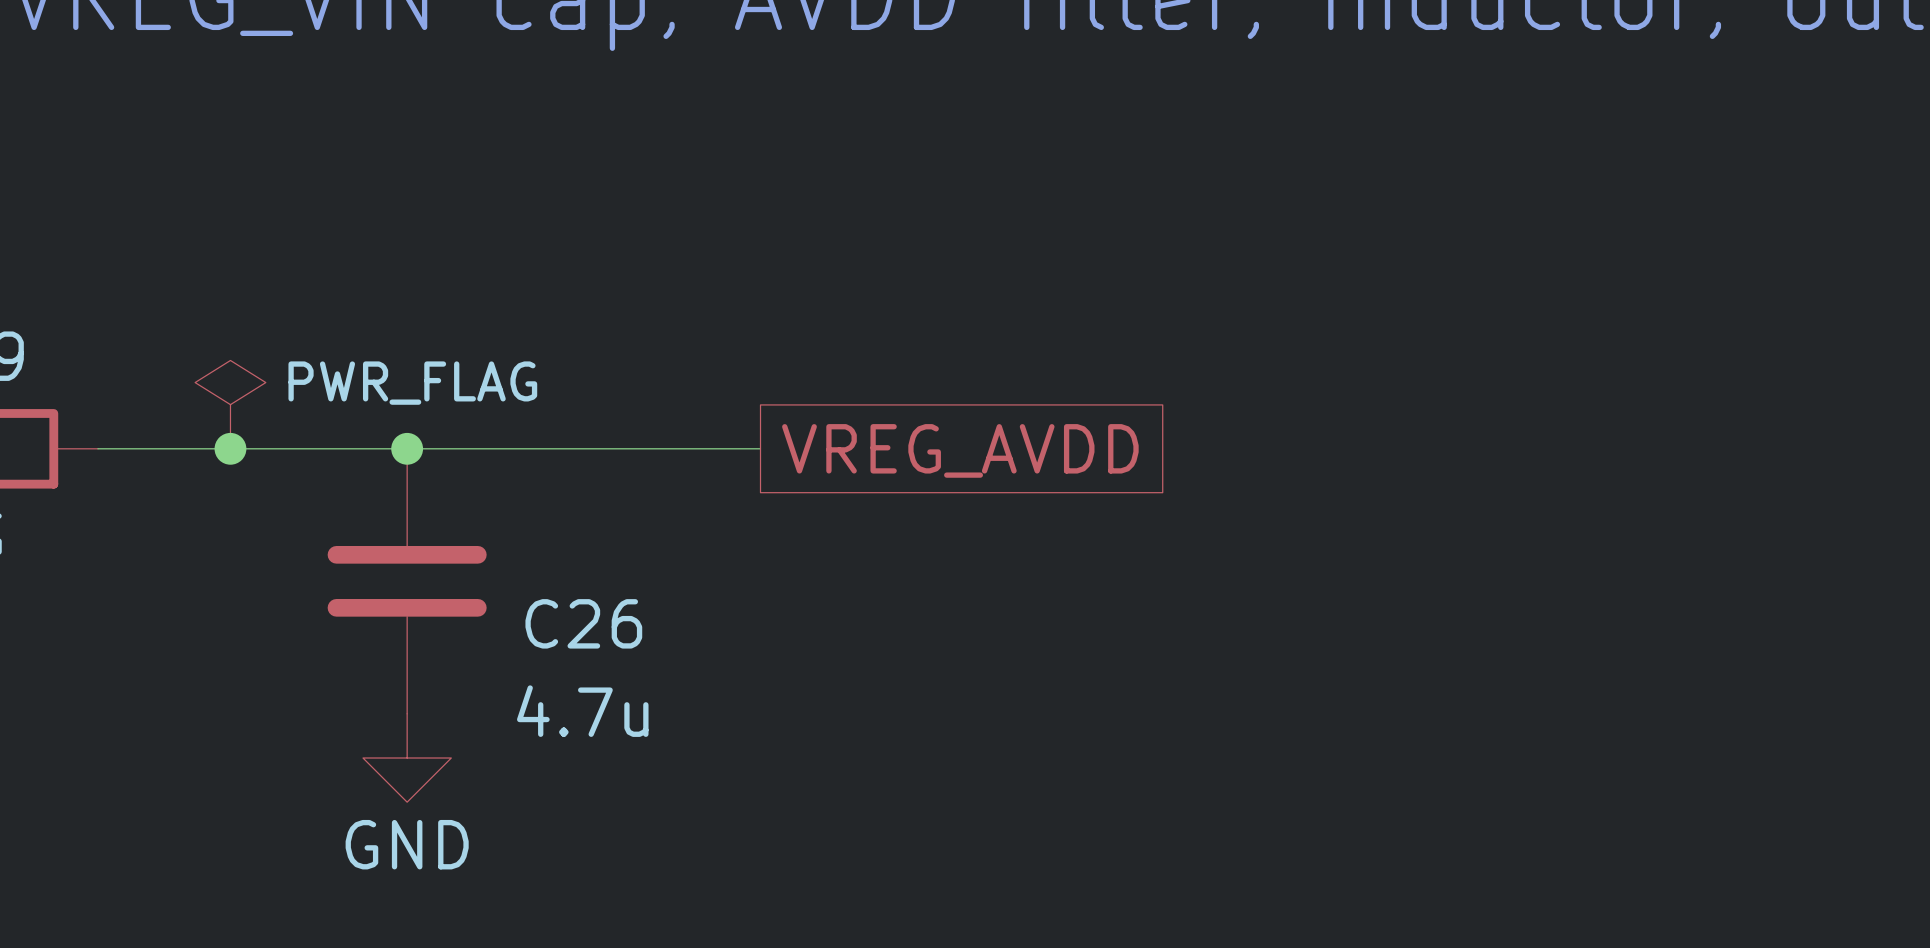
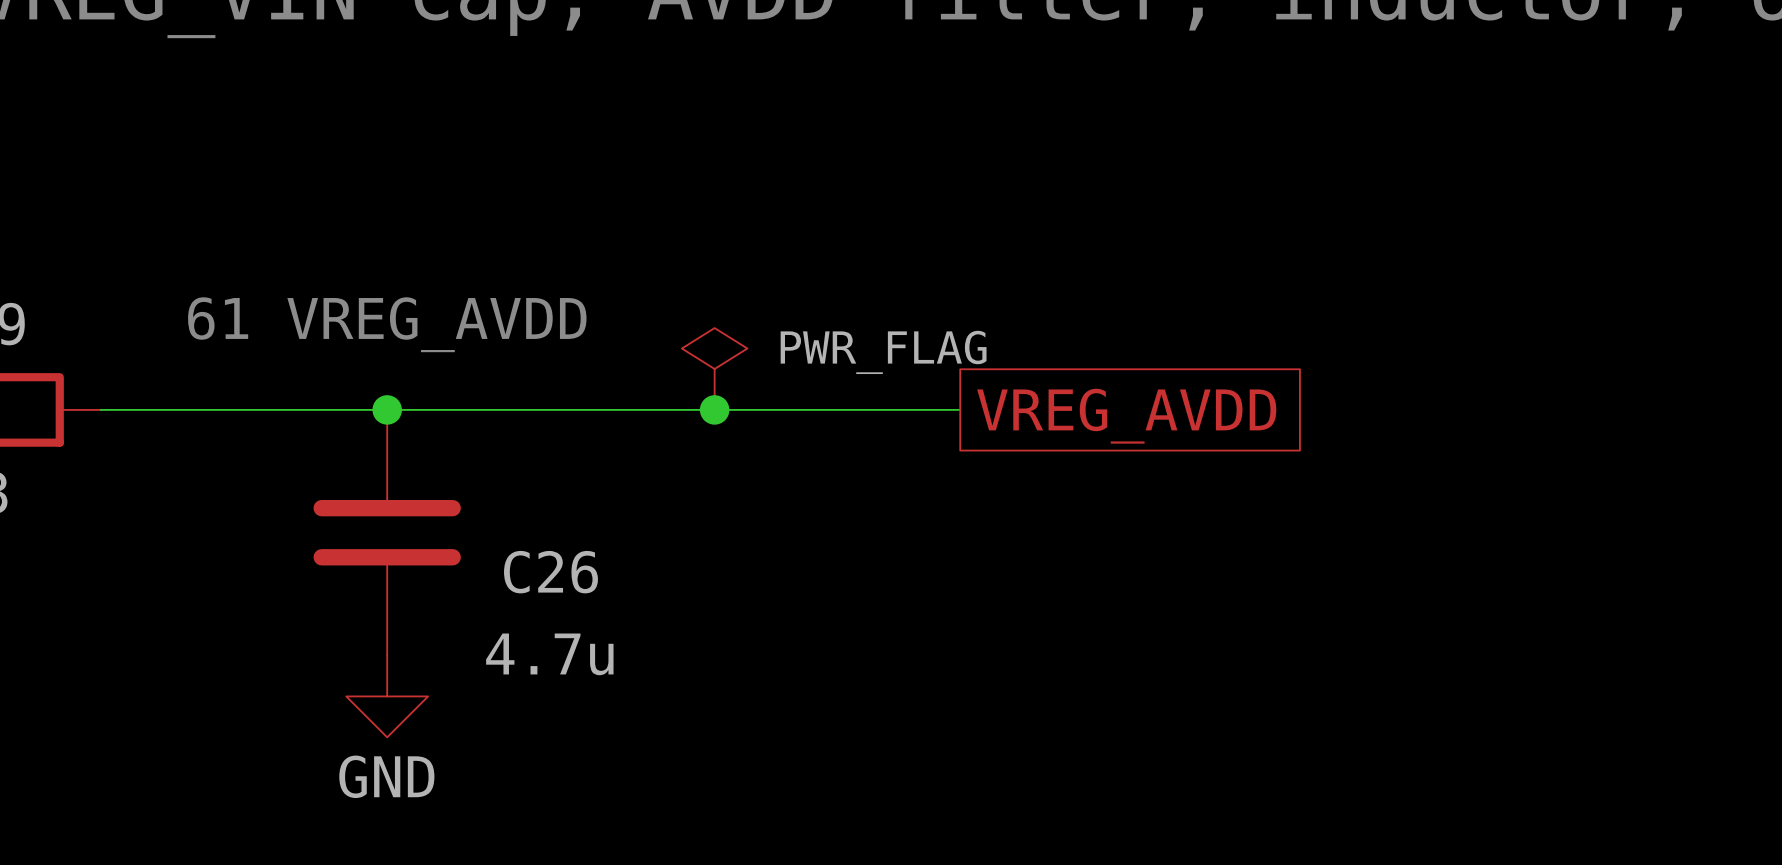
text: none -> 61 VREG_AVDD (387, 324)
power symbol position: PWR_FLAG (230, 404) -> PWR_FLAG (714, 368)
junction: (230, 448) -> none
wire: none -> (714, 409) (960, 409)
junction: none -> (714, 409)
global label position: VREG_AVDD (960, 450) -> VREG_AVDD (1126, 416)

